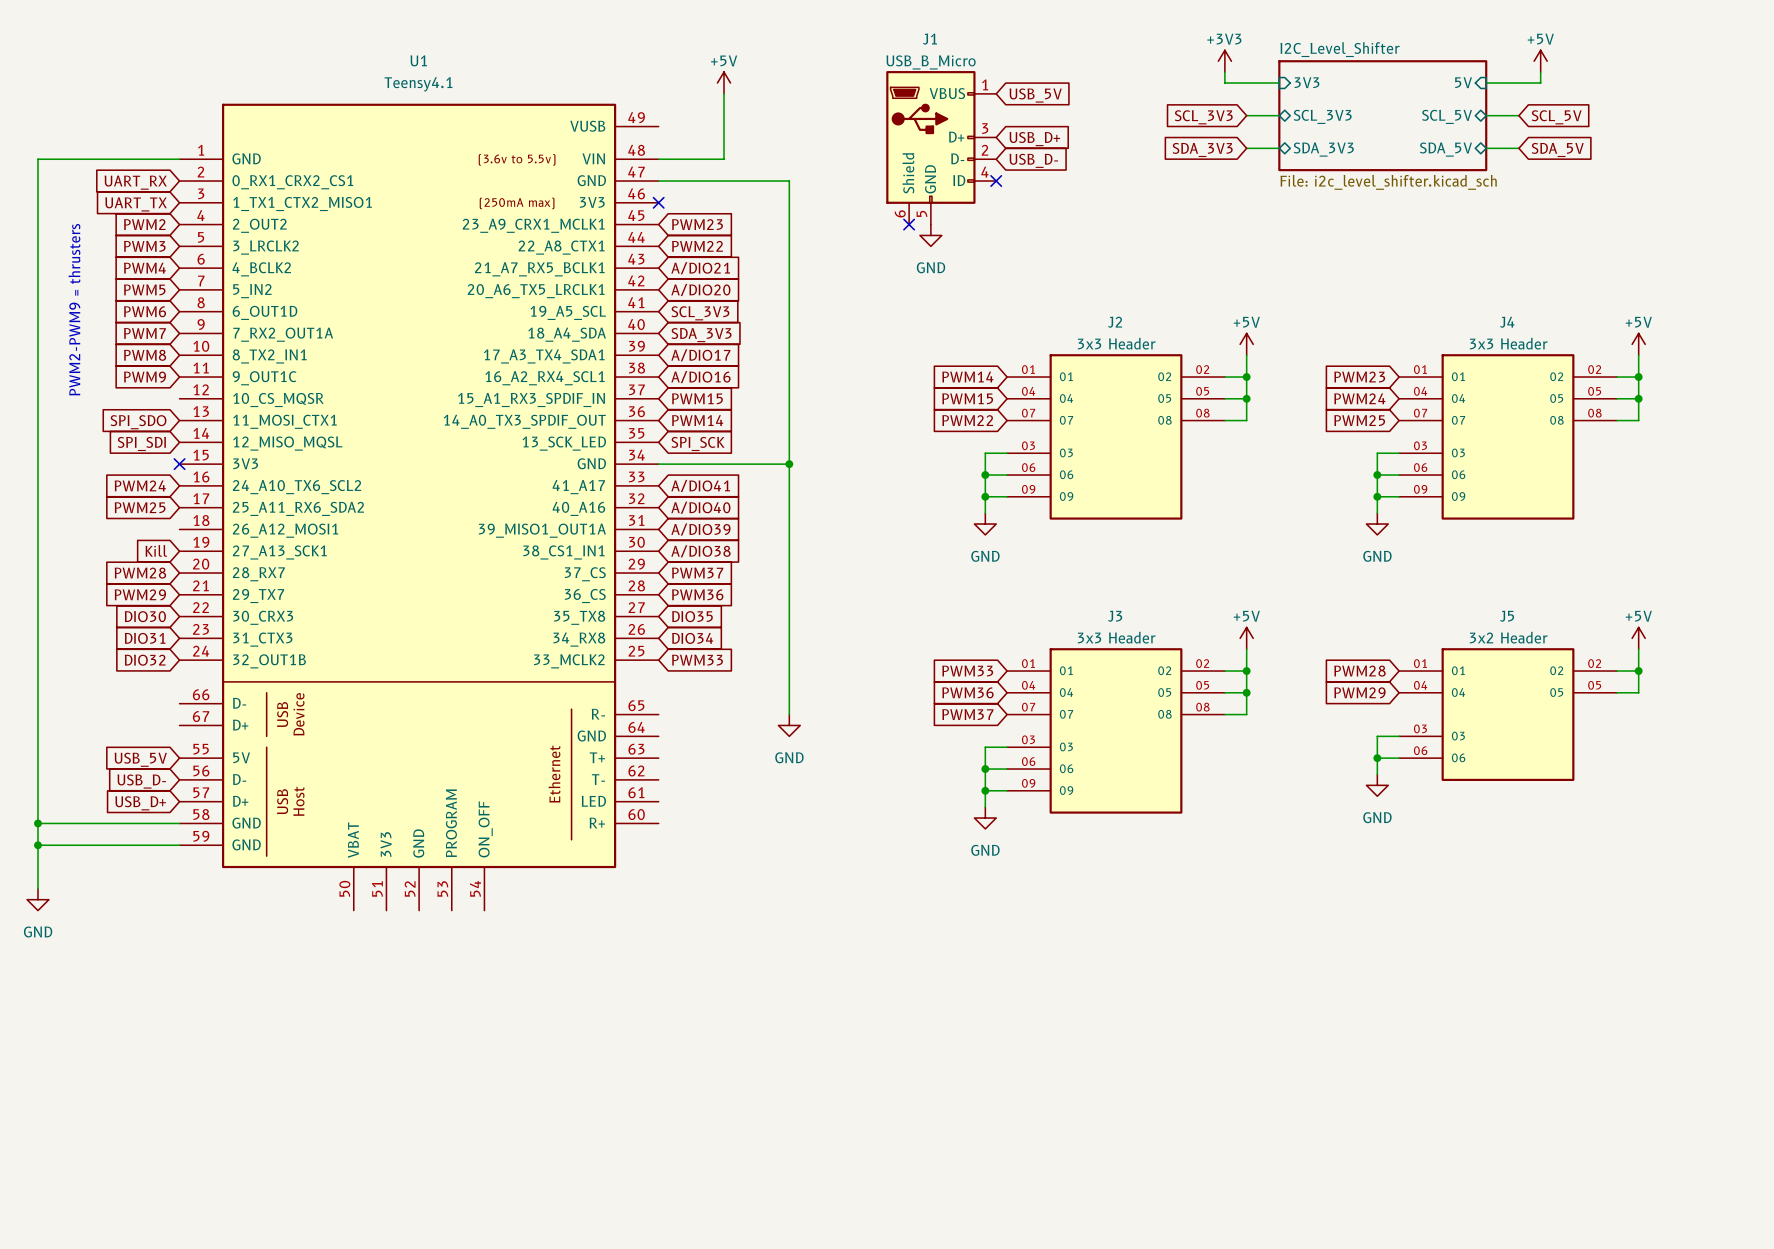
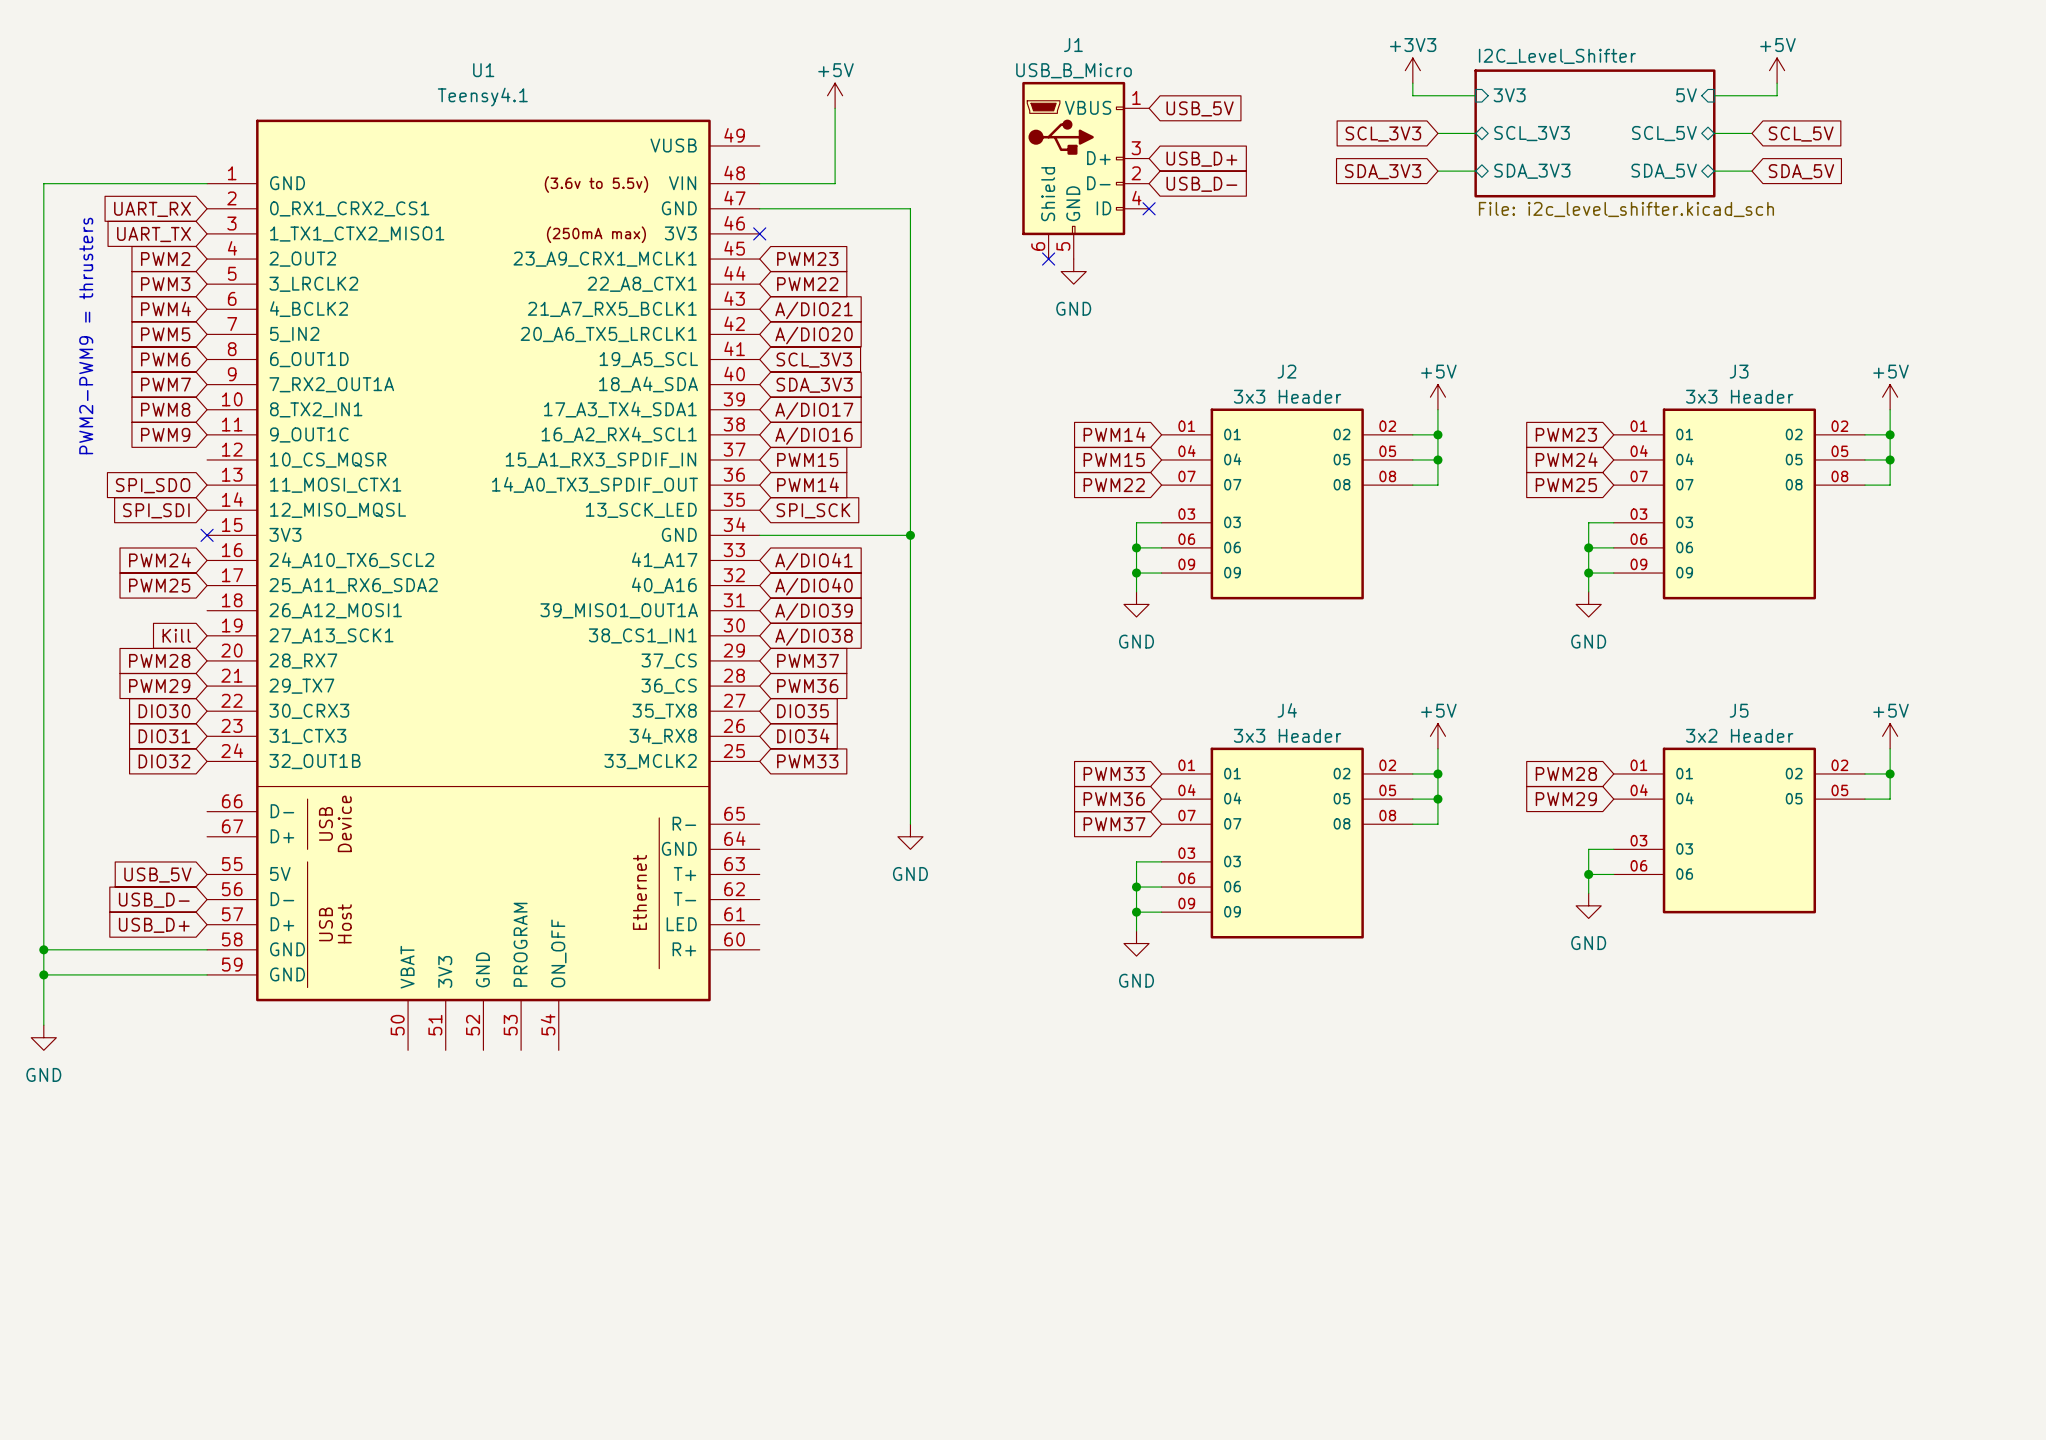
J4 name: J4 (1507, 322) -> J3 (1739, 371)
J3 name: J3 (1115, 616) -> J4 (1287, 710)
J5 symbol: [1399, 648, 1617, 781] -> [1613, 747, 1865, 914]

